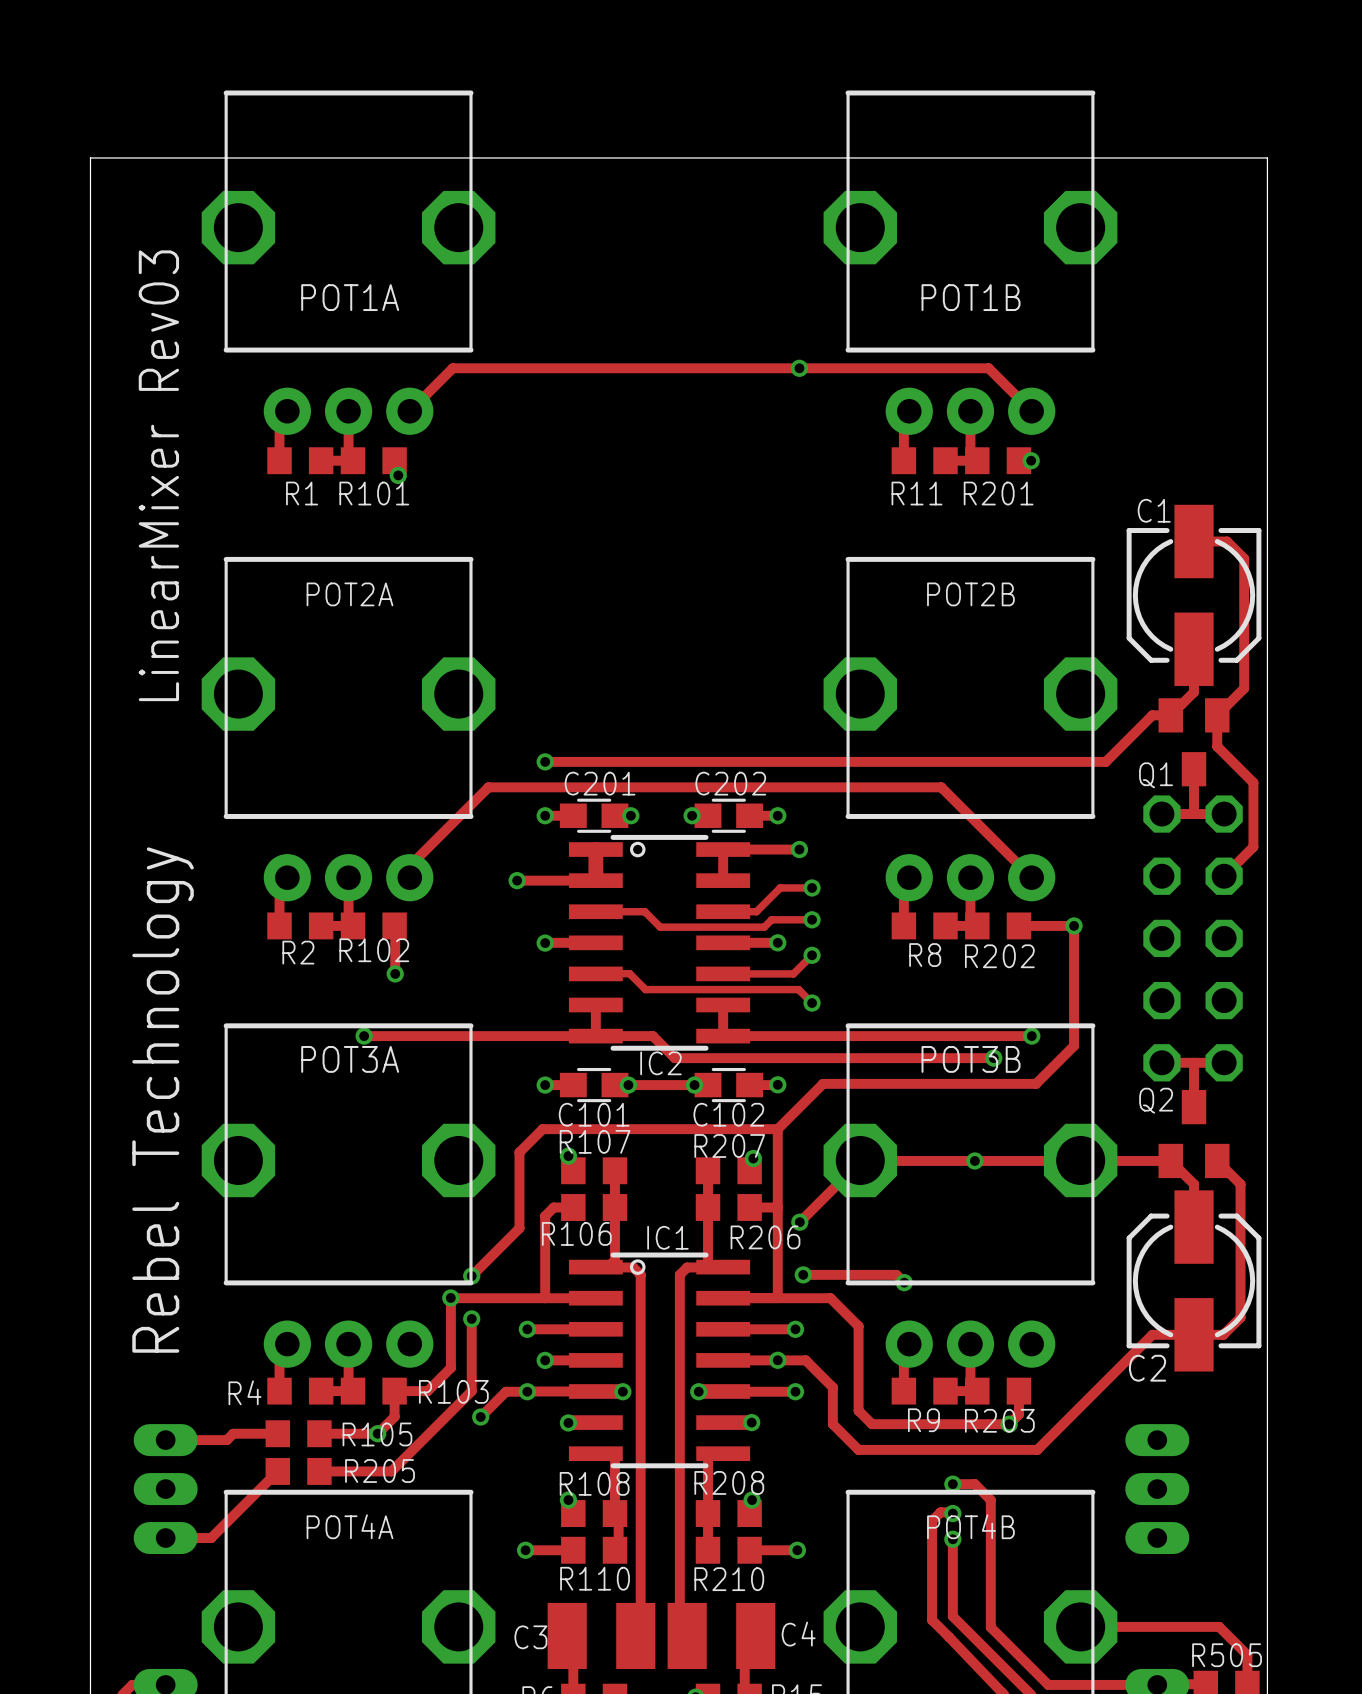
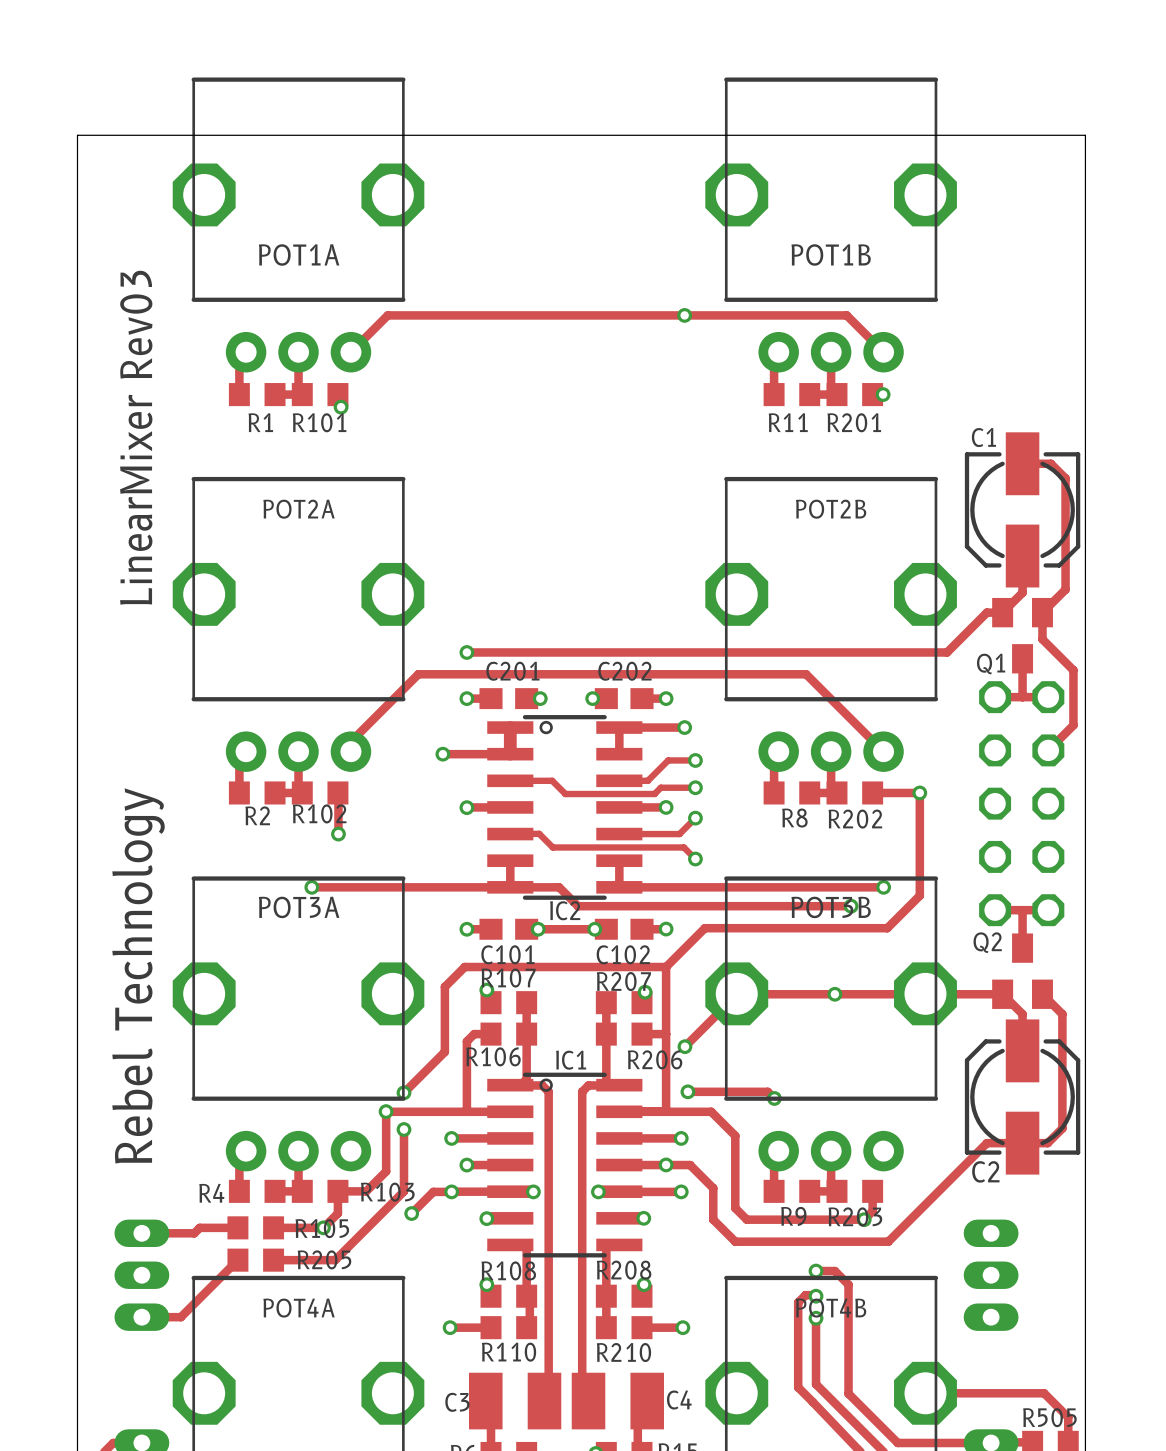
C201 footprint: [559, 798, 629, 833] -> [479, 688, 539, 710]
C202 footprint: [694, 798, 764, 833] -> [594, 688, 654, 710]
C101 footprint: [559, 1067, 629, 1103] -> [479, 918, 539, 940]
C102 footprint: [694, 1067, 764, 1103] -> [594, 918, 654, 940]

